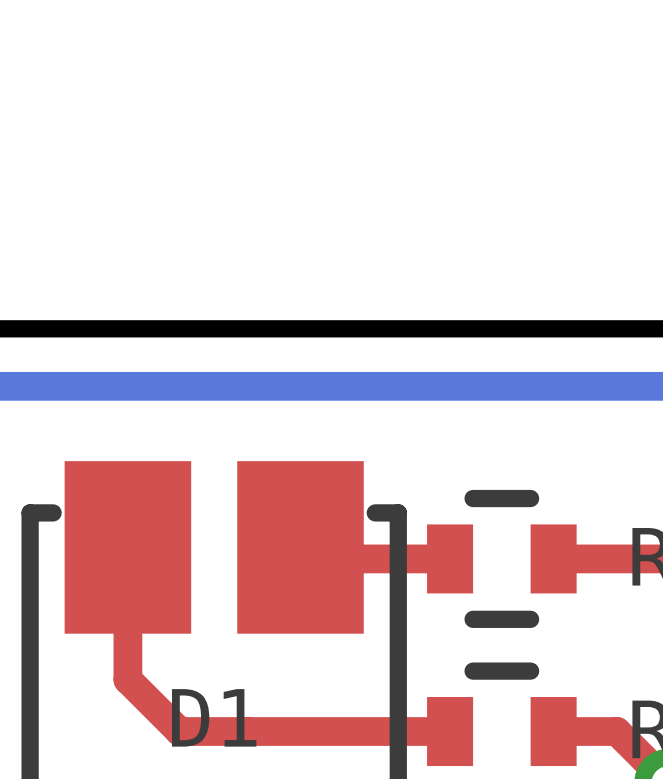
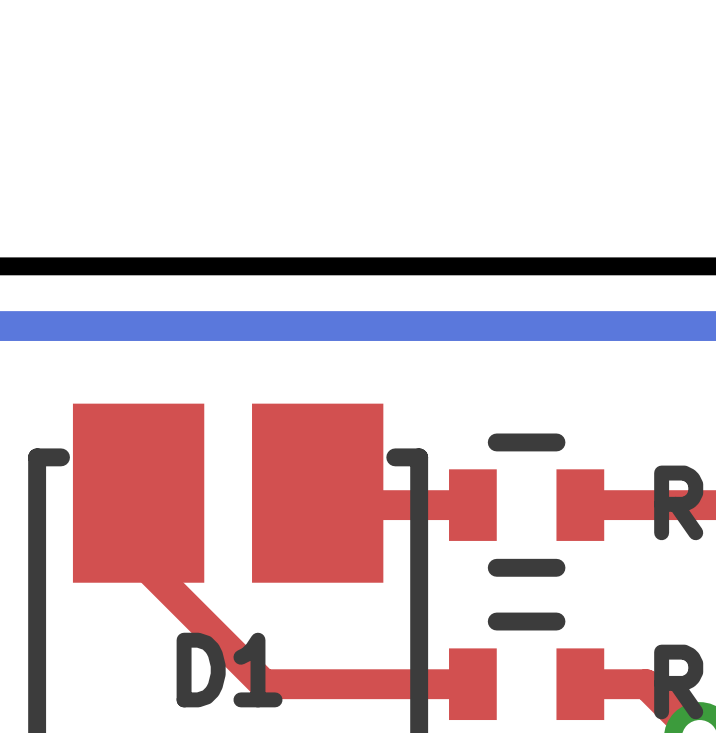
top track: (127, 610) (127, 679) (179, 731) (248, 731) -> (138, 558) (263, 684)

